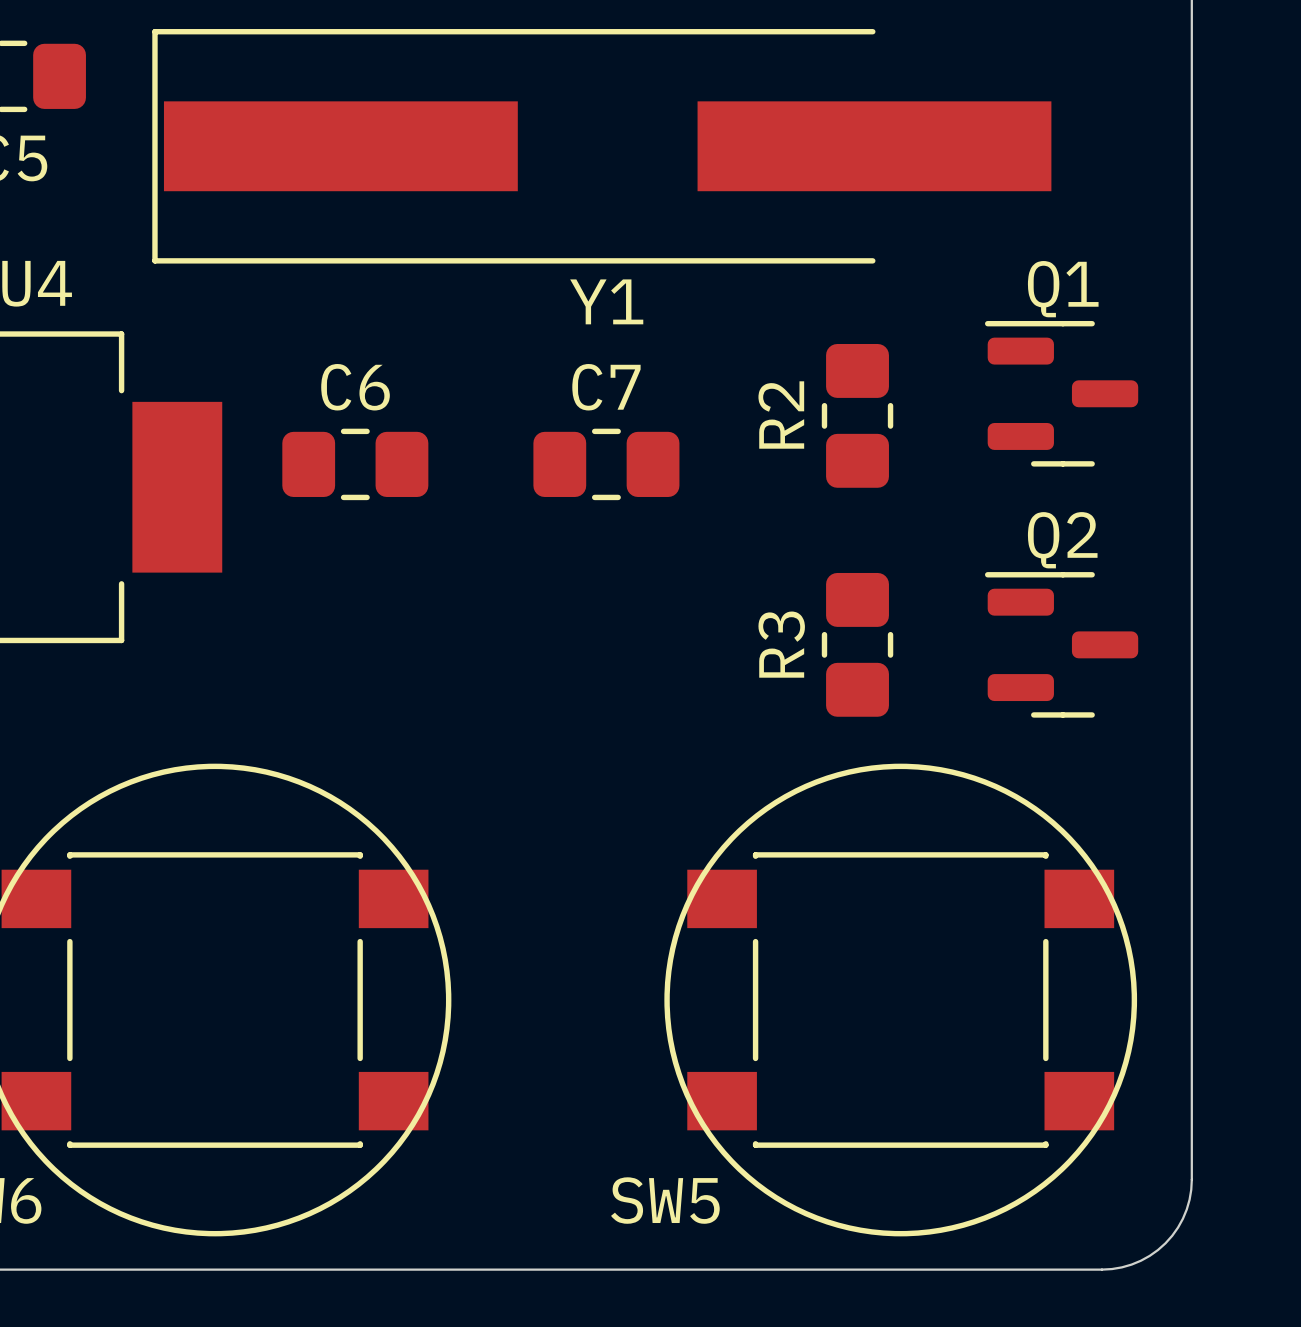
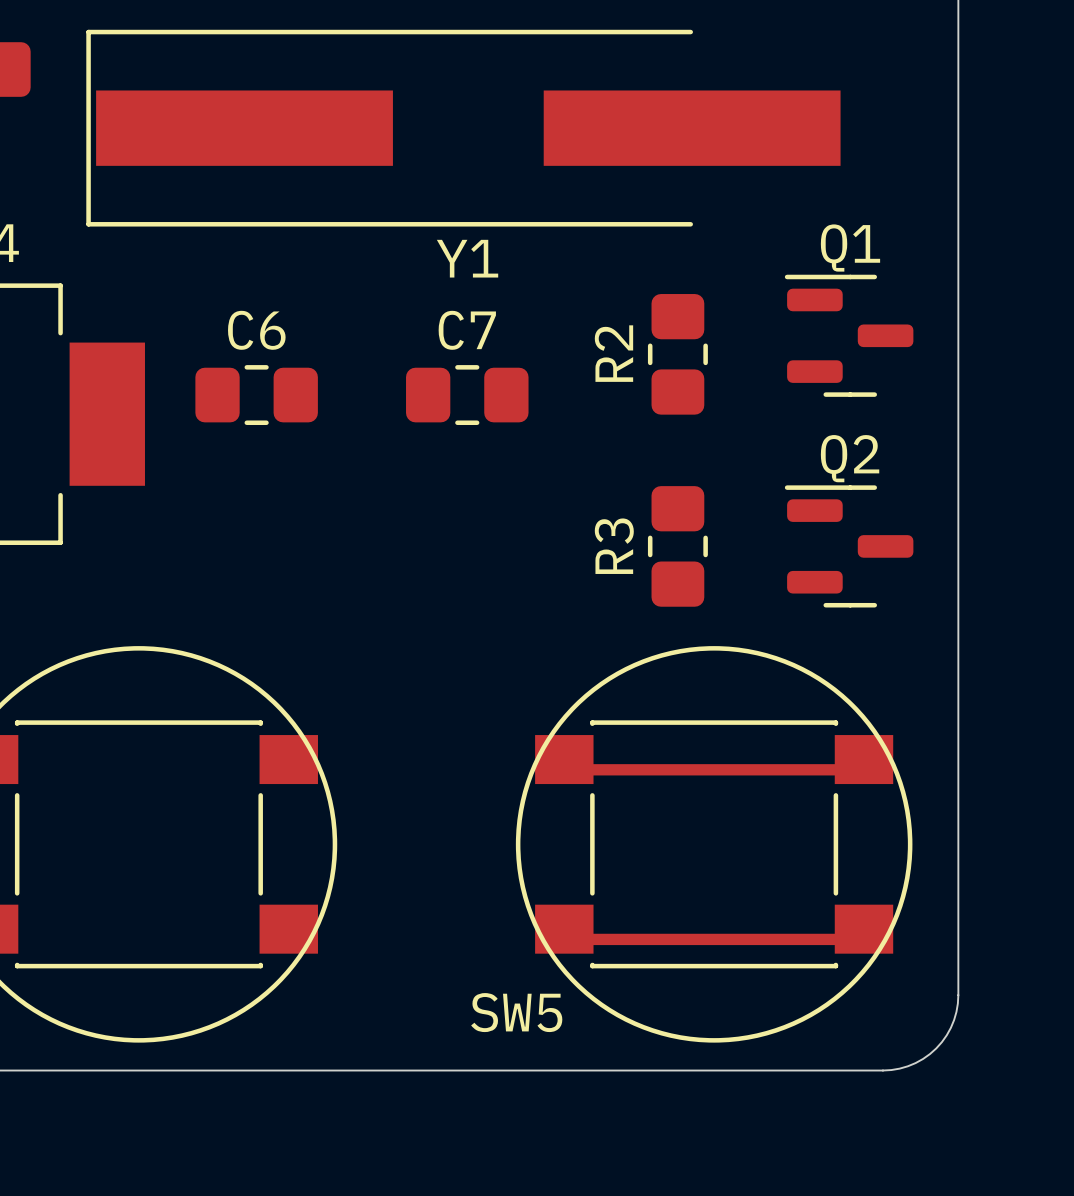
track: none -> (564, 769) (863, 769)
track: none -> (564, 939) (863, 939)

